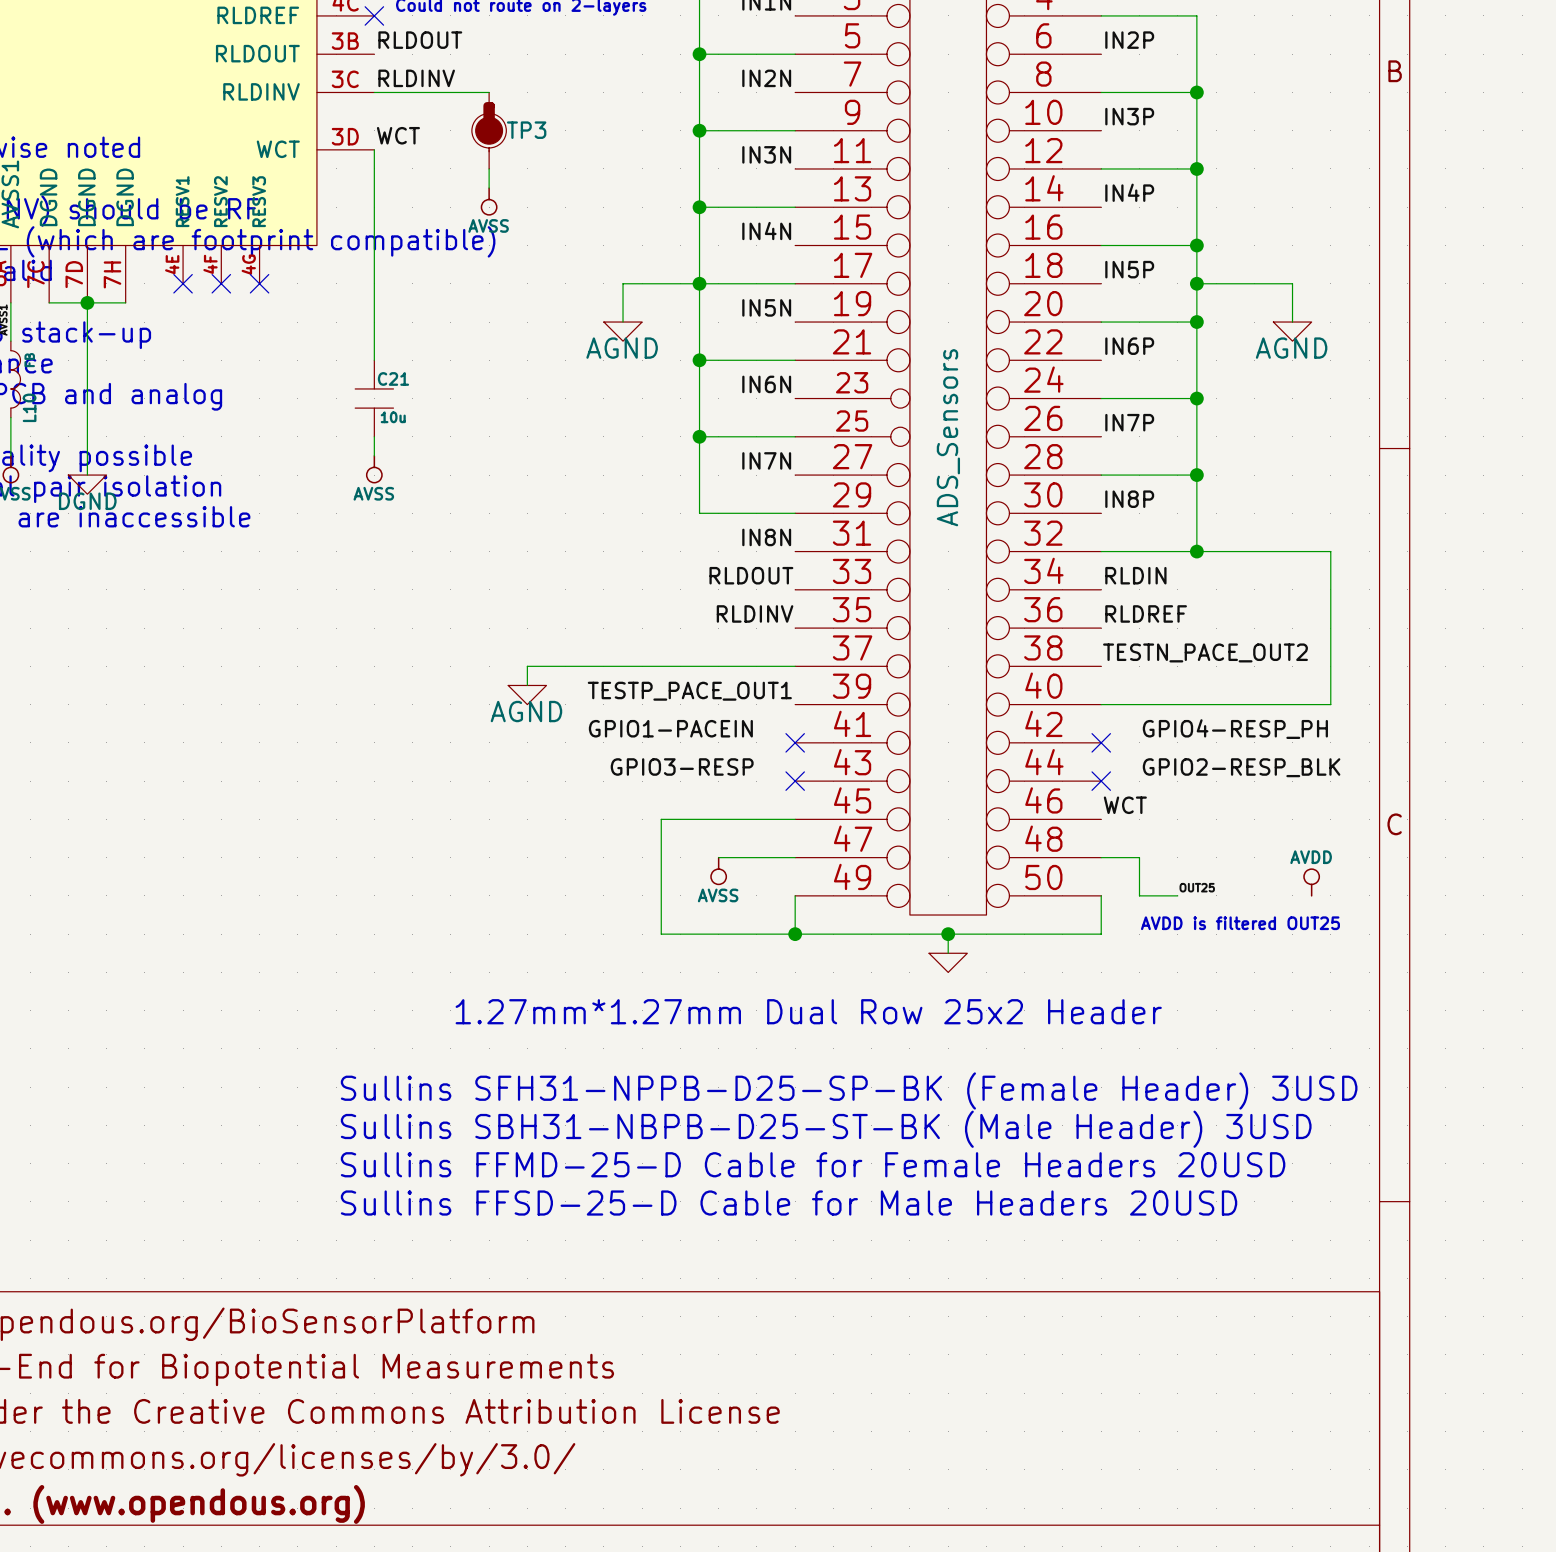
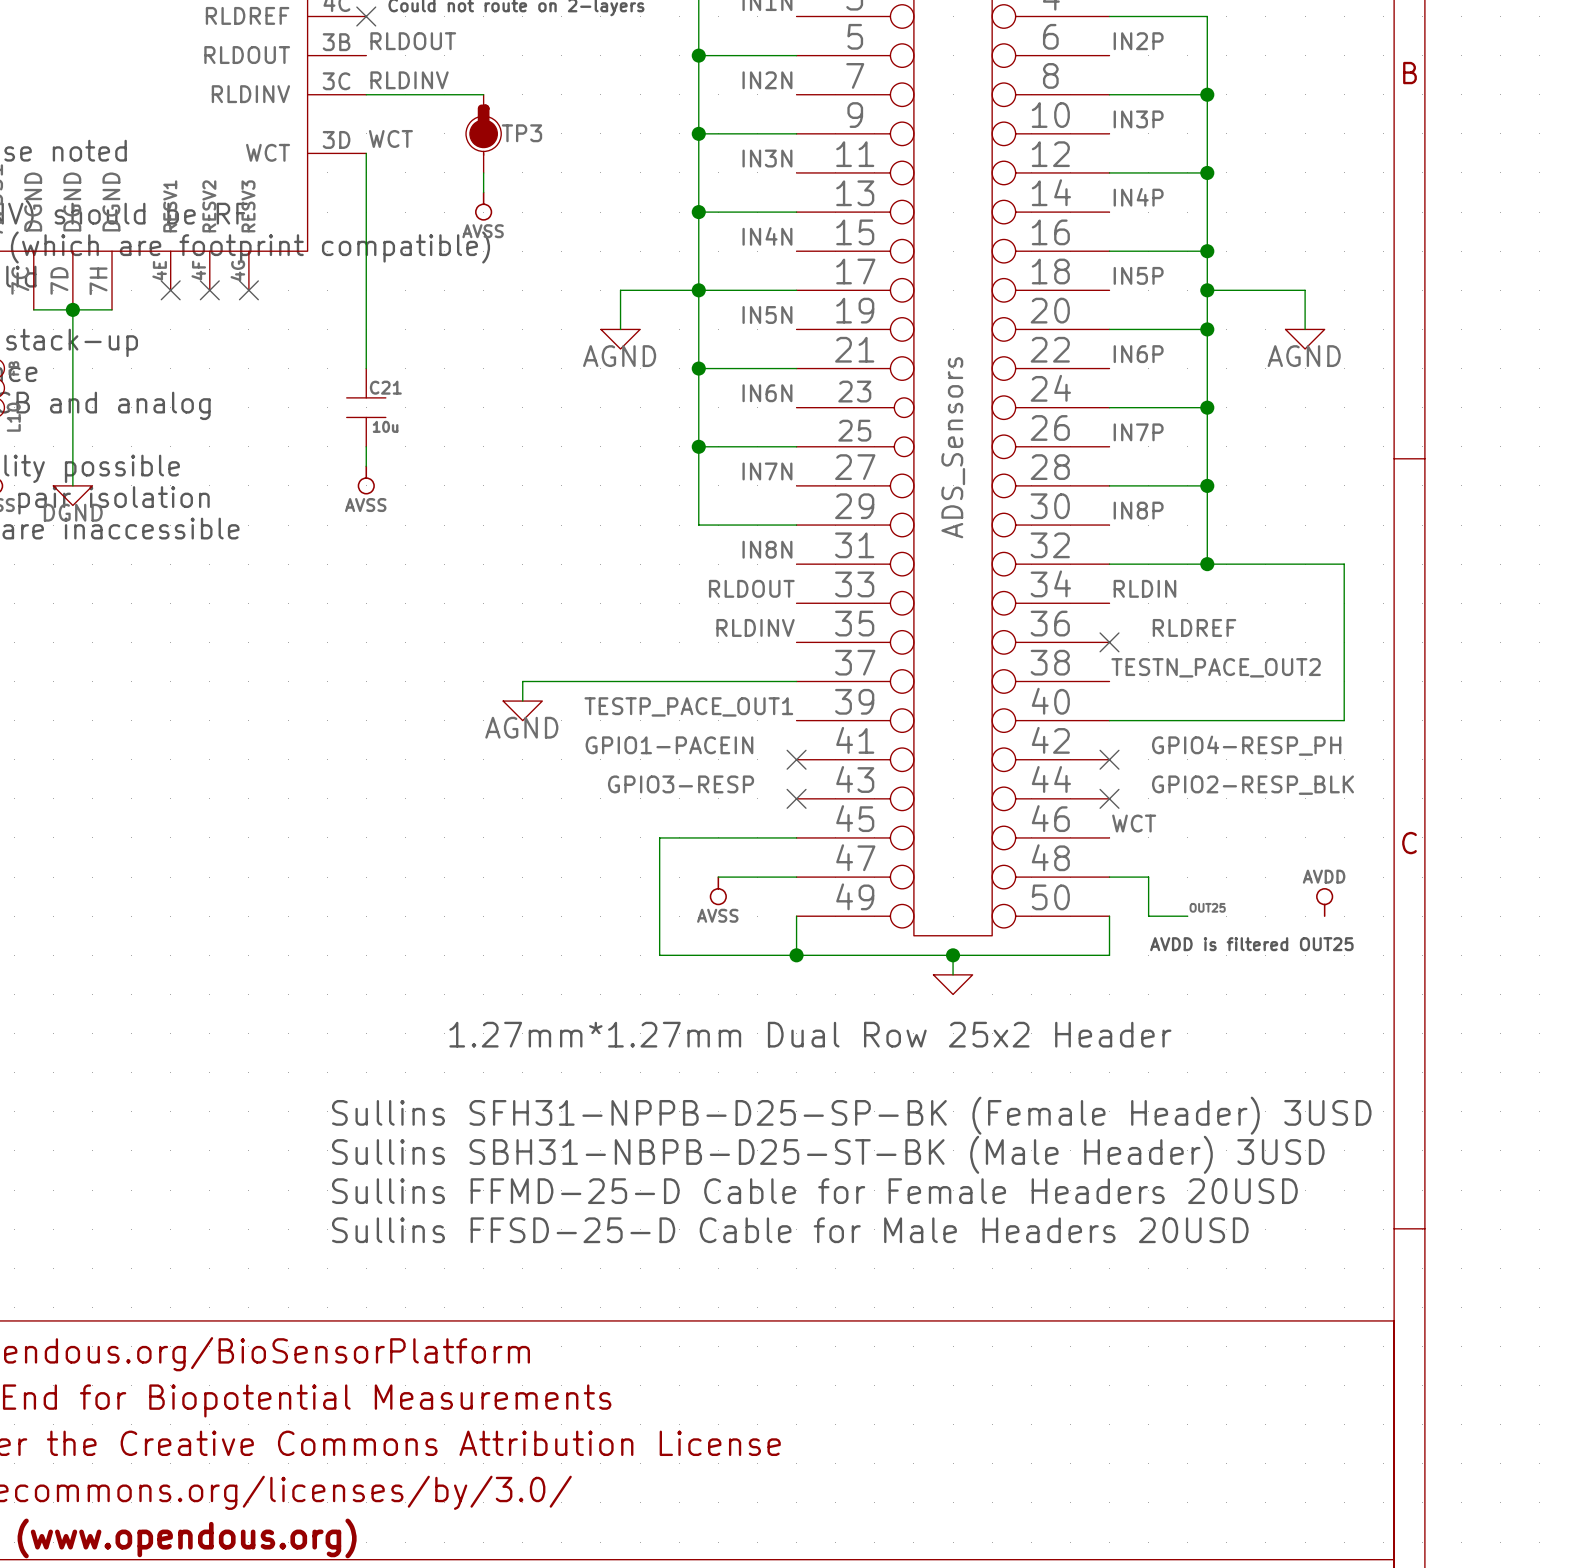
label position: RLDREF (1146, 613) -> RLDREF (1194, 627)
no-connect mark: none -> (1109, 642)

